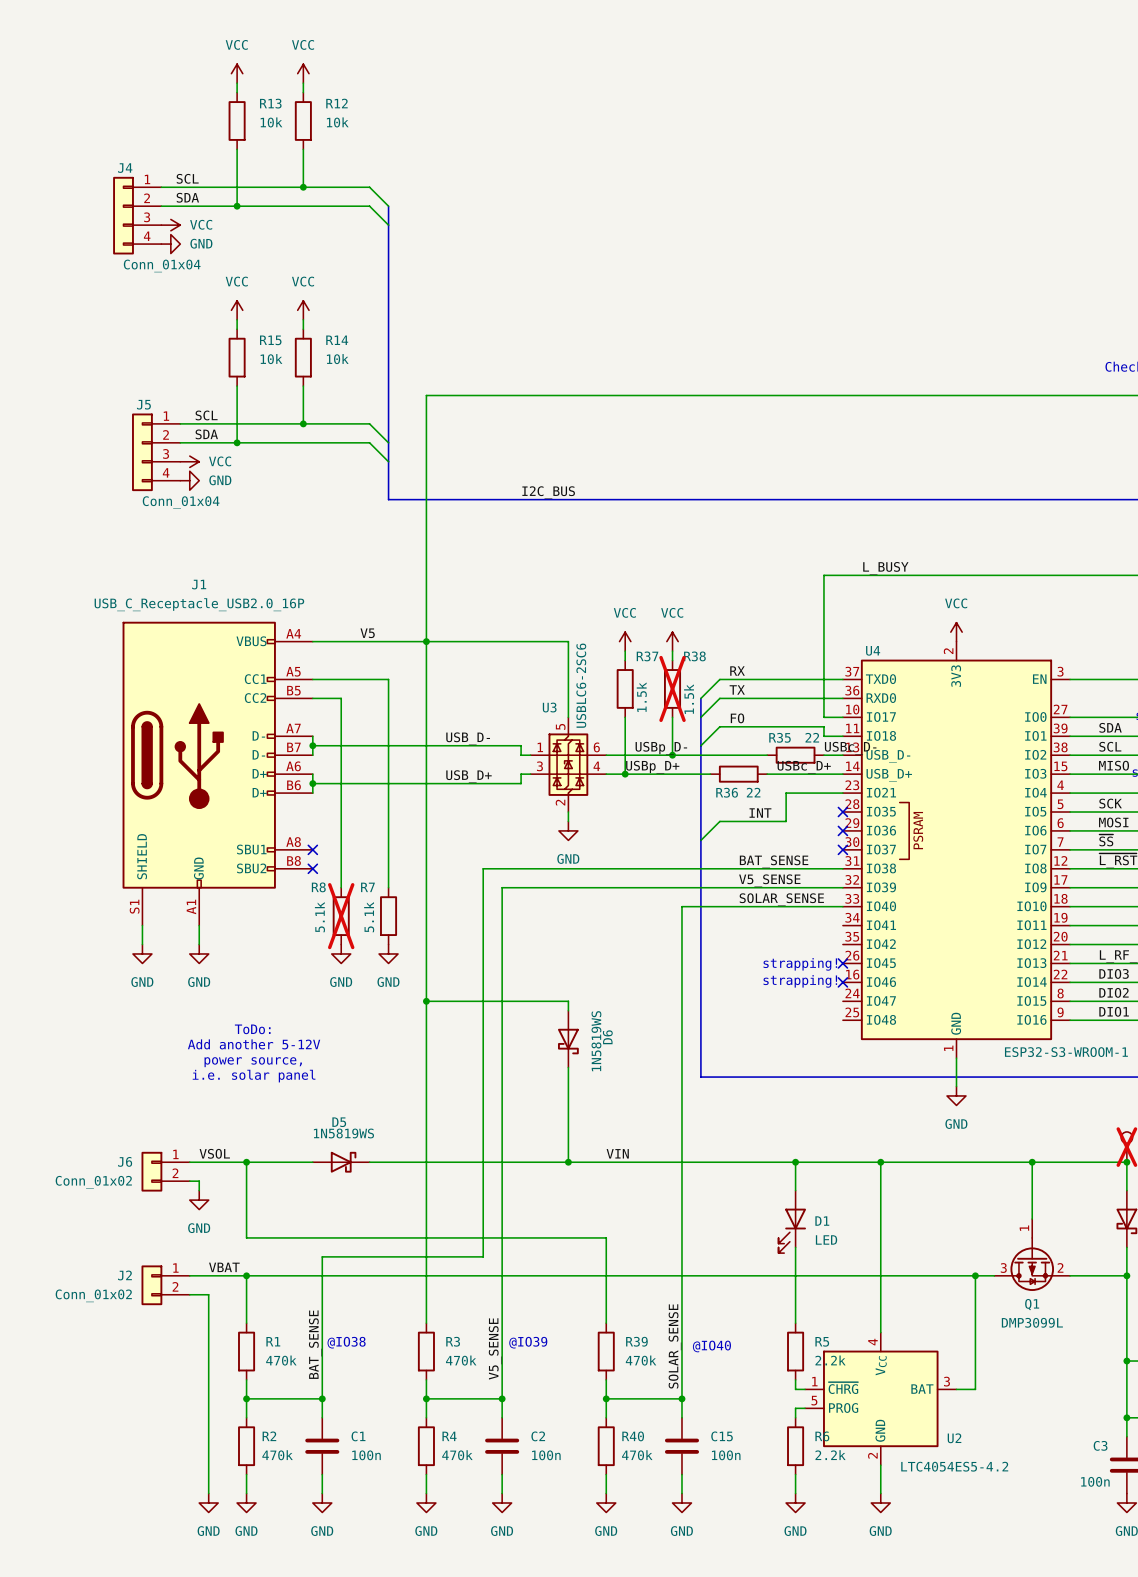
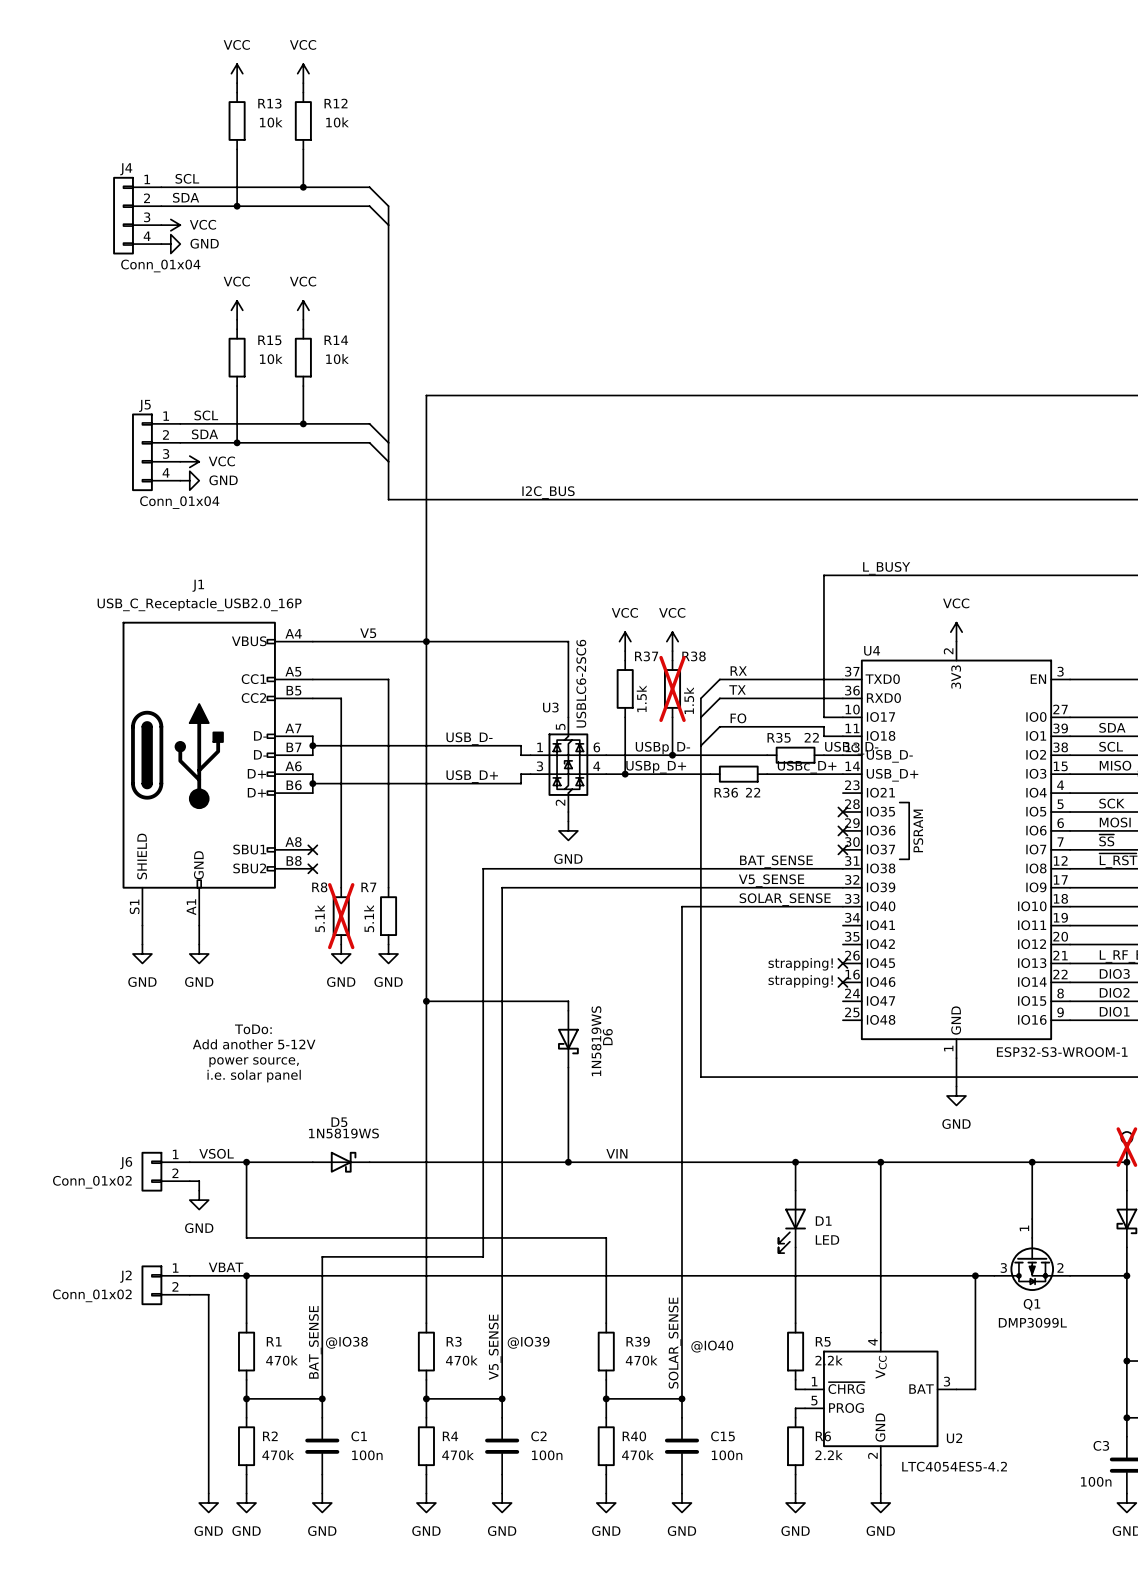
wire: (842, 793) (786, 793) (786, 821) (719, 821) (700, 840) -> none
label: INT (760, 813) -> none

